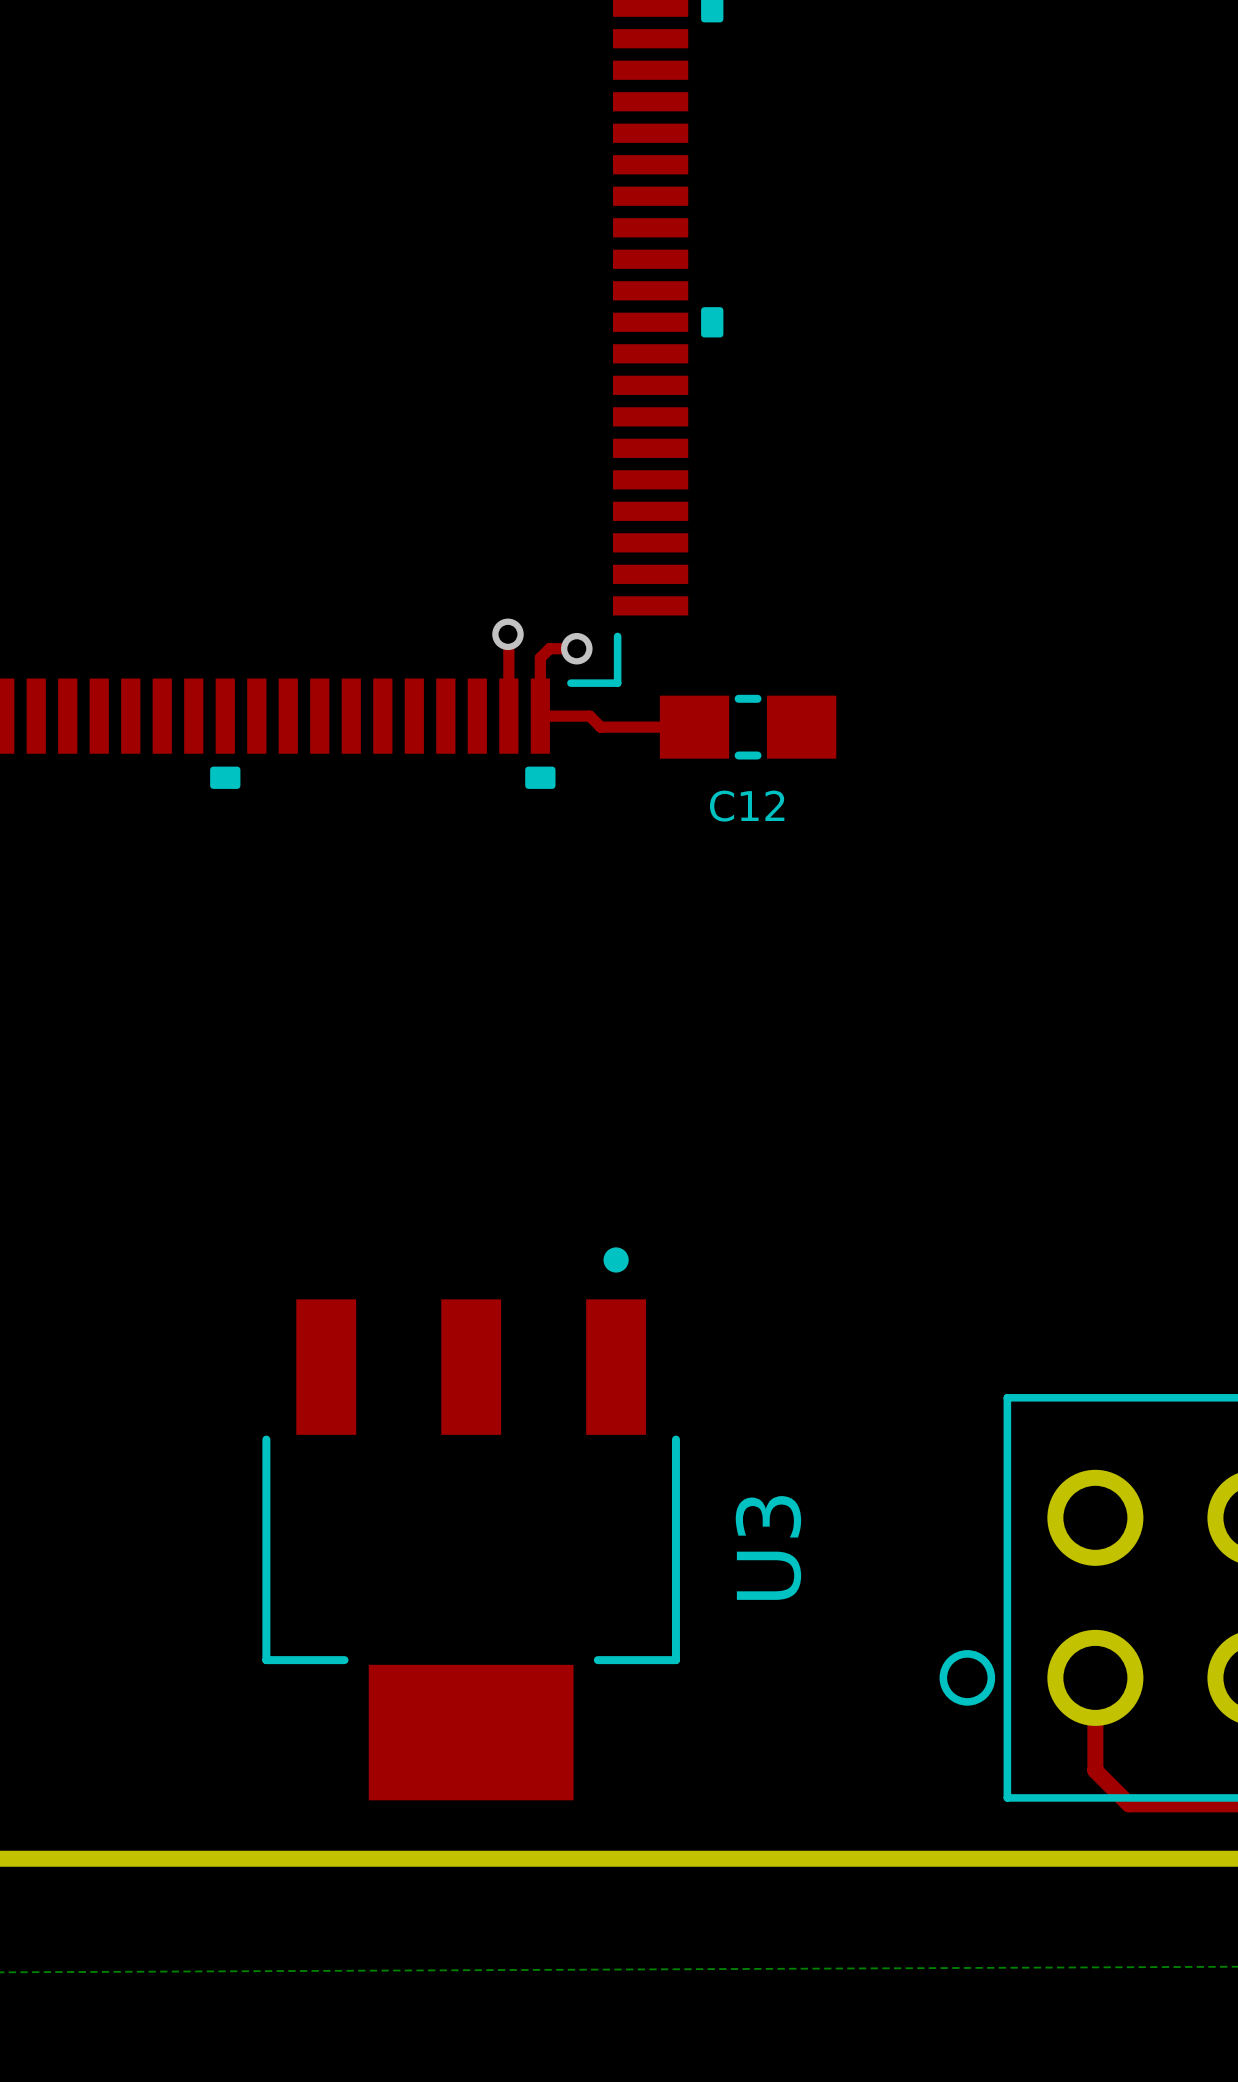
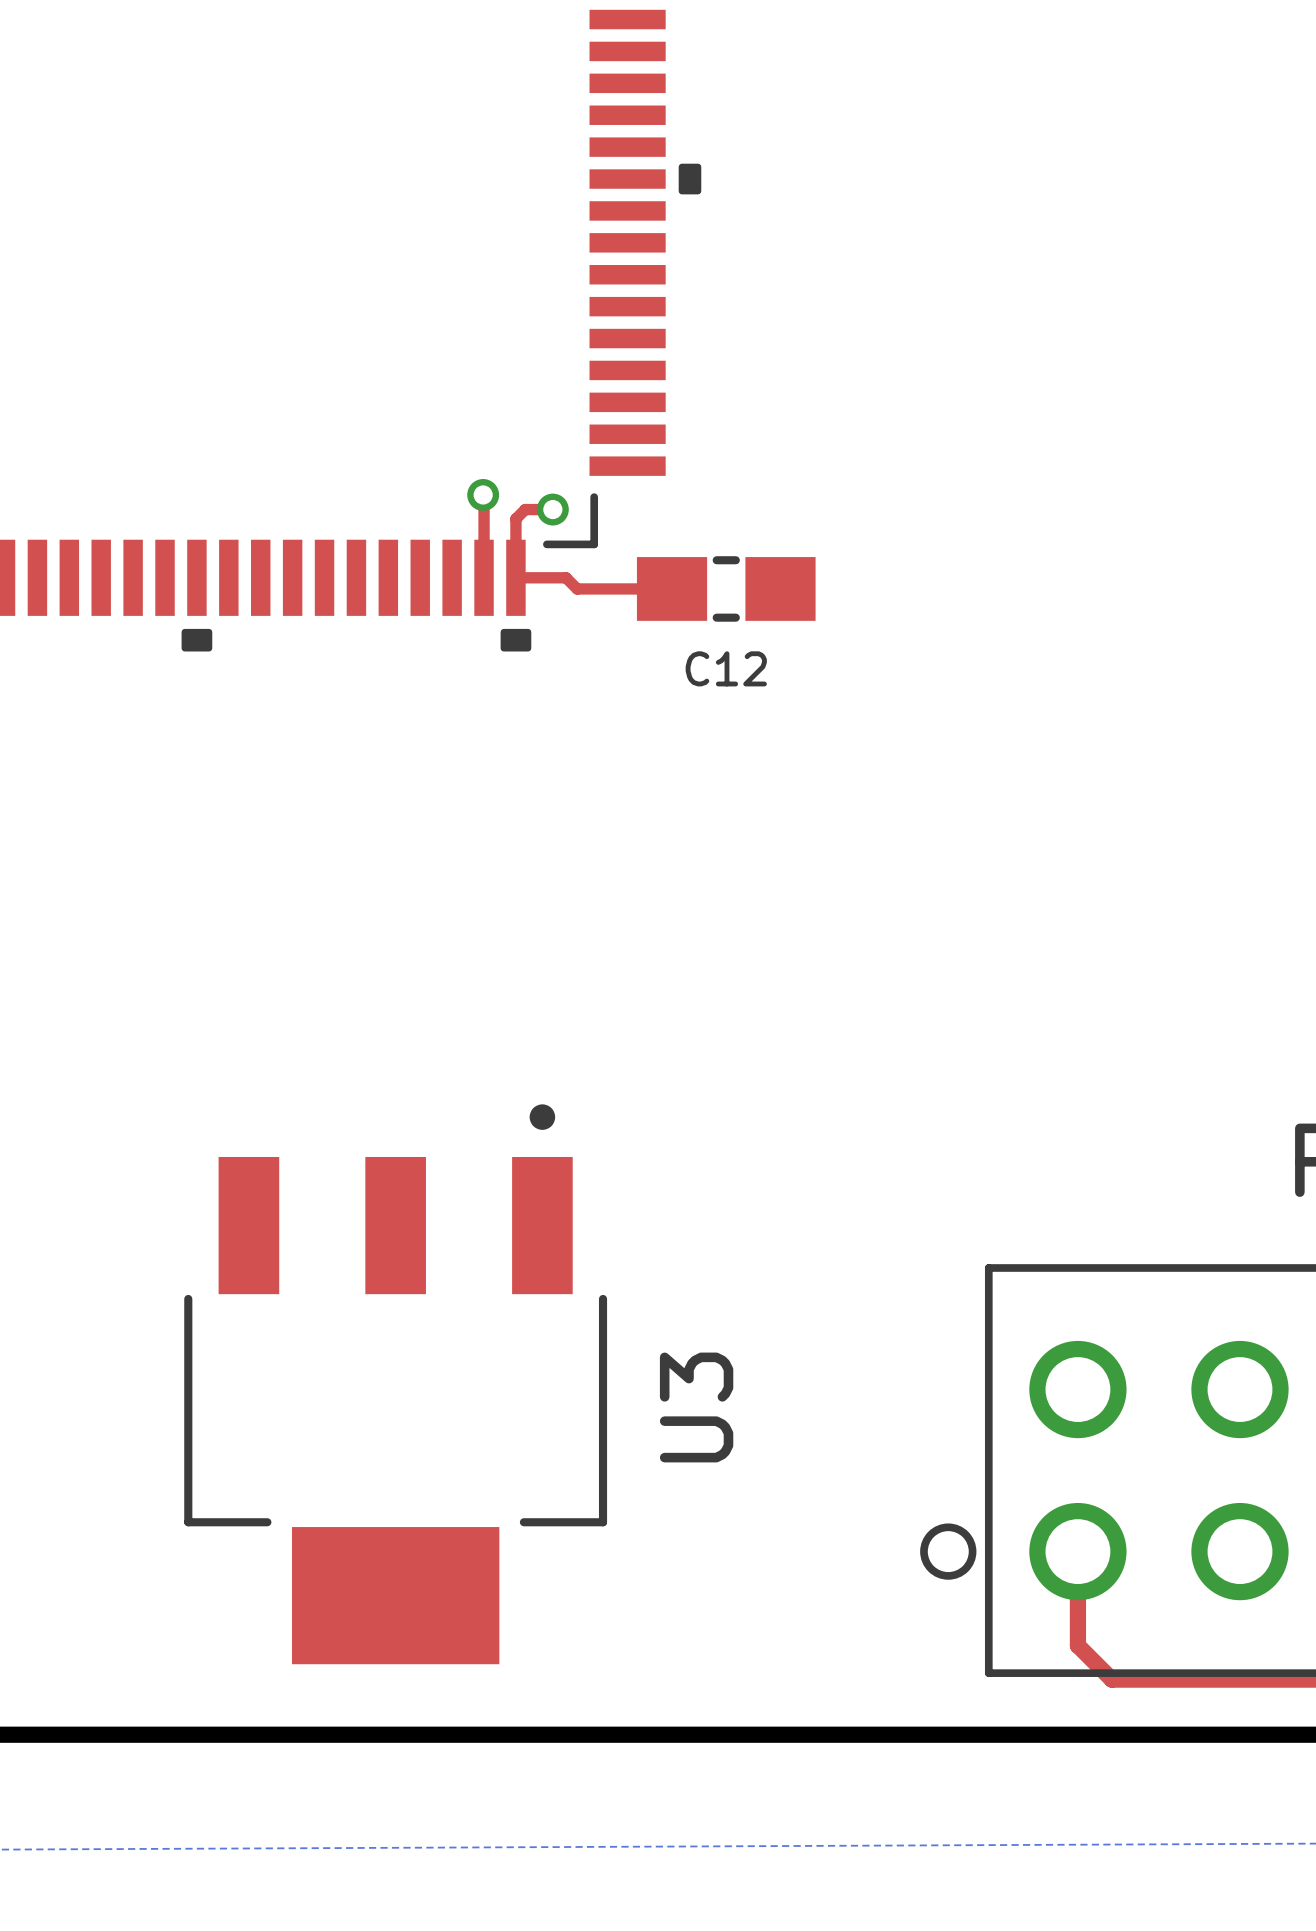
U3 position: (471, 1523) -> (395, 1384)

